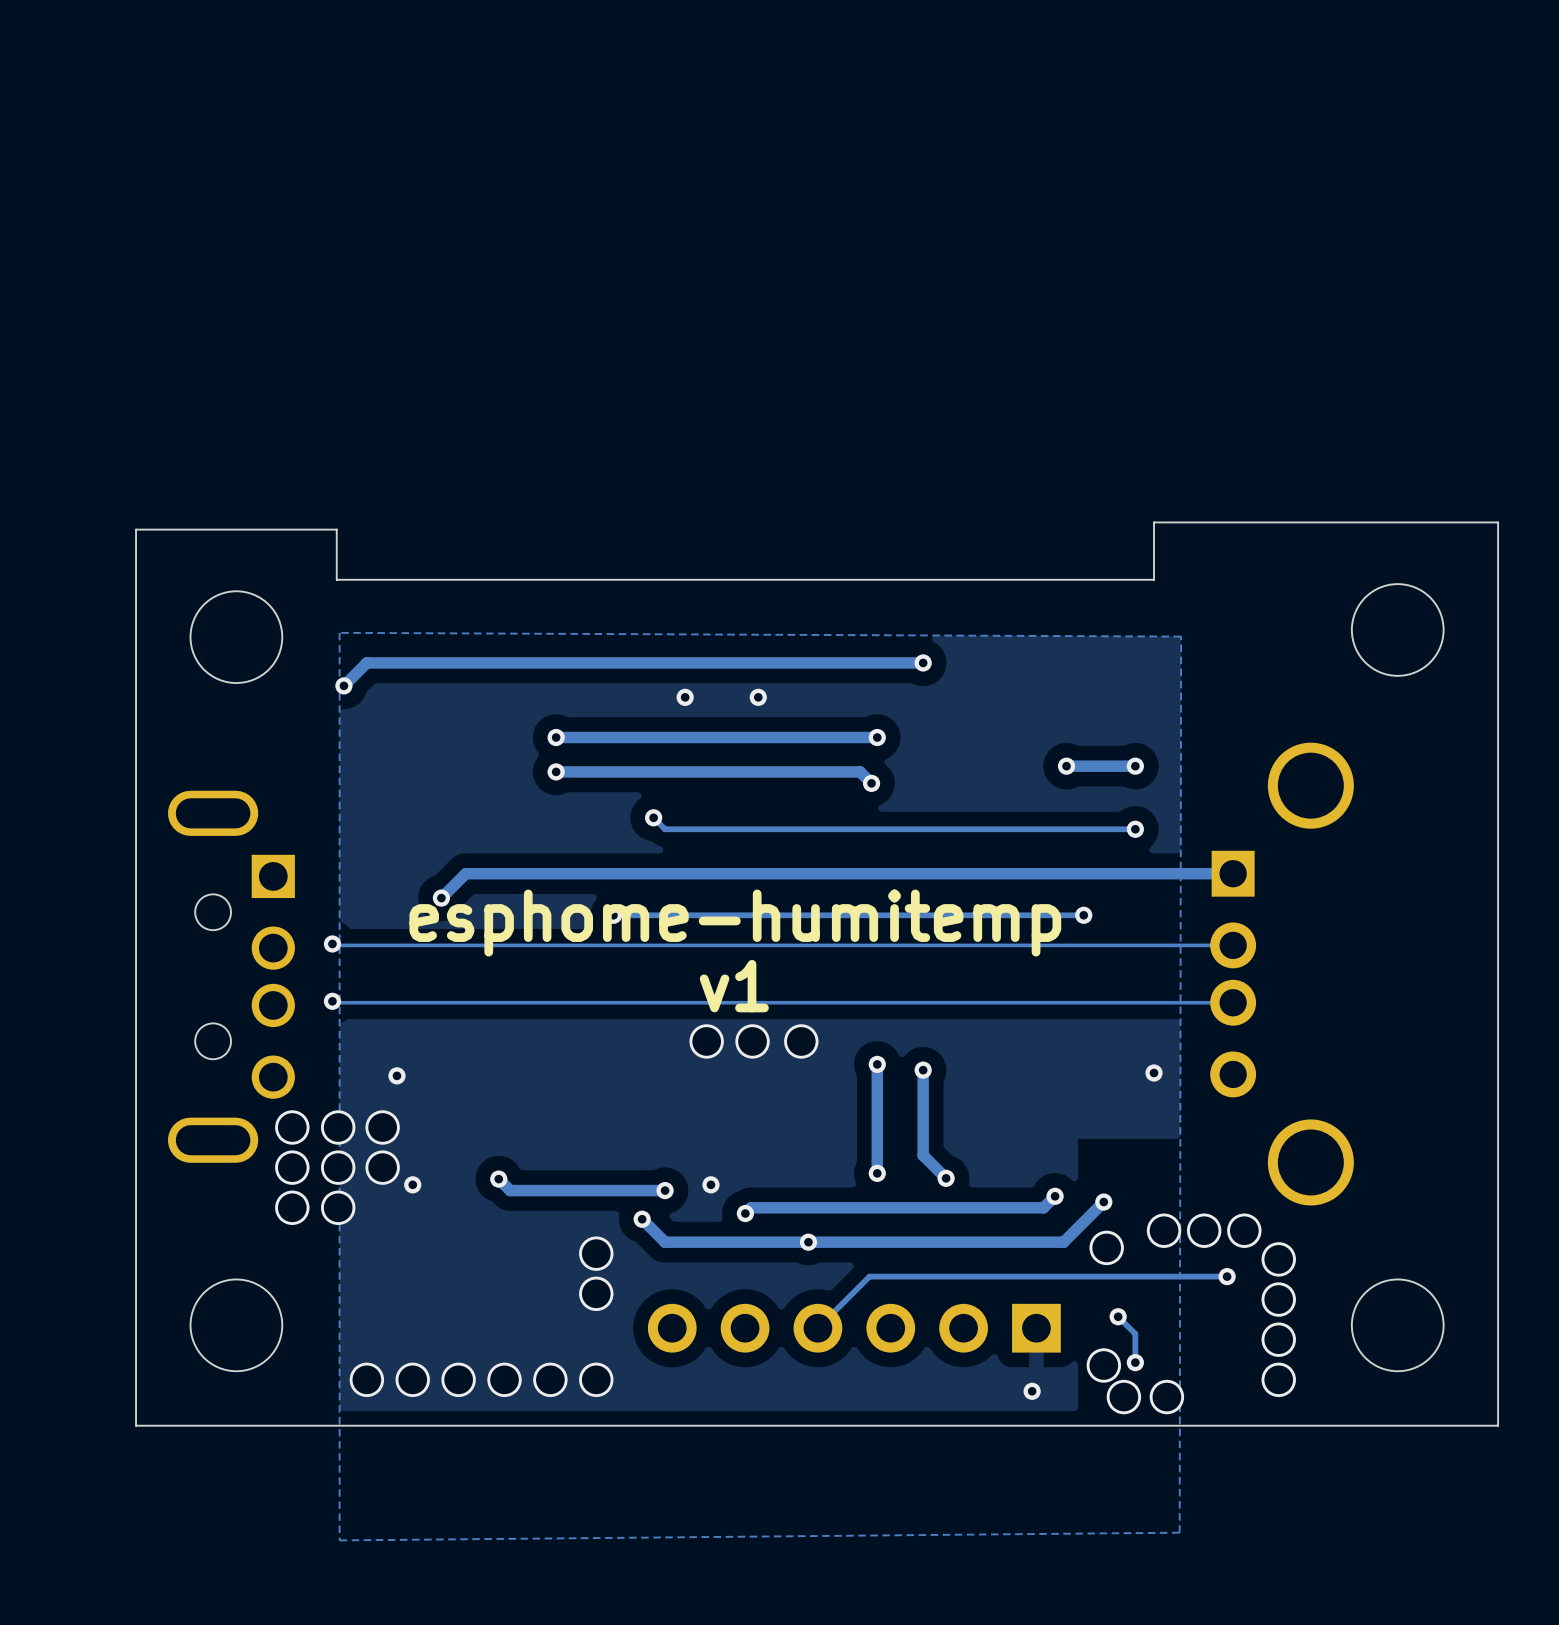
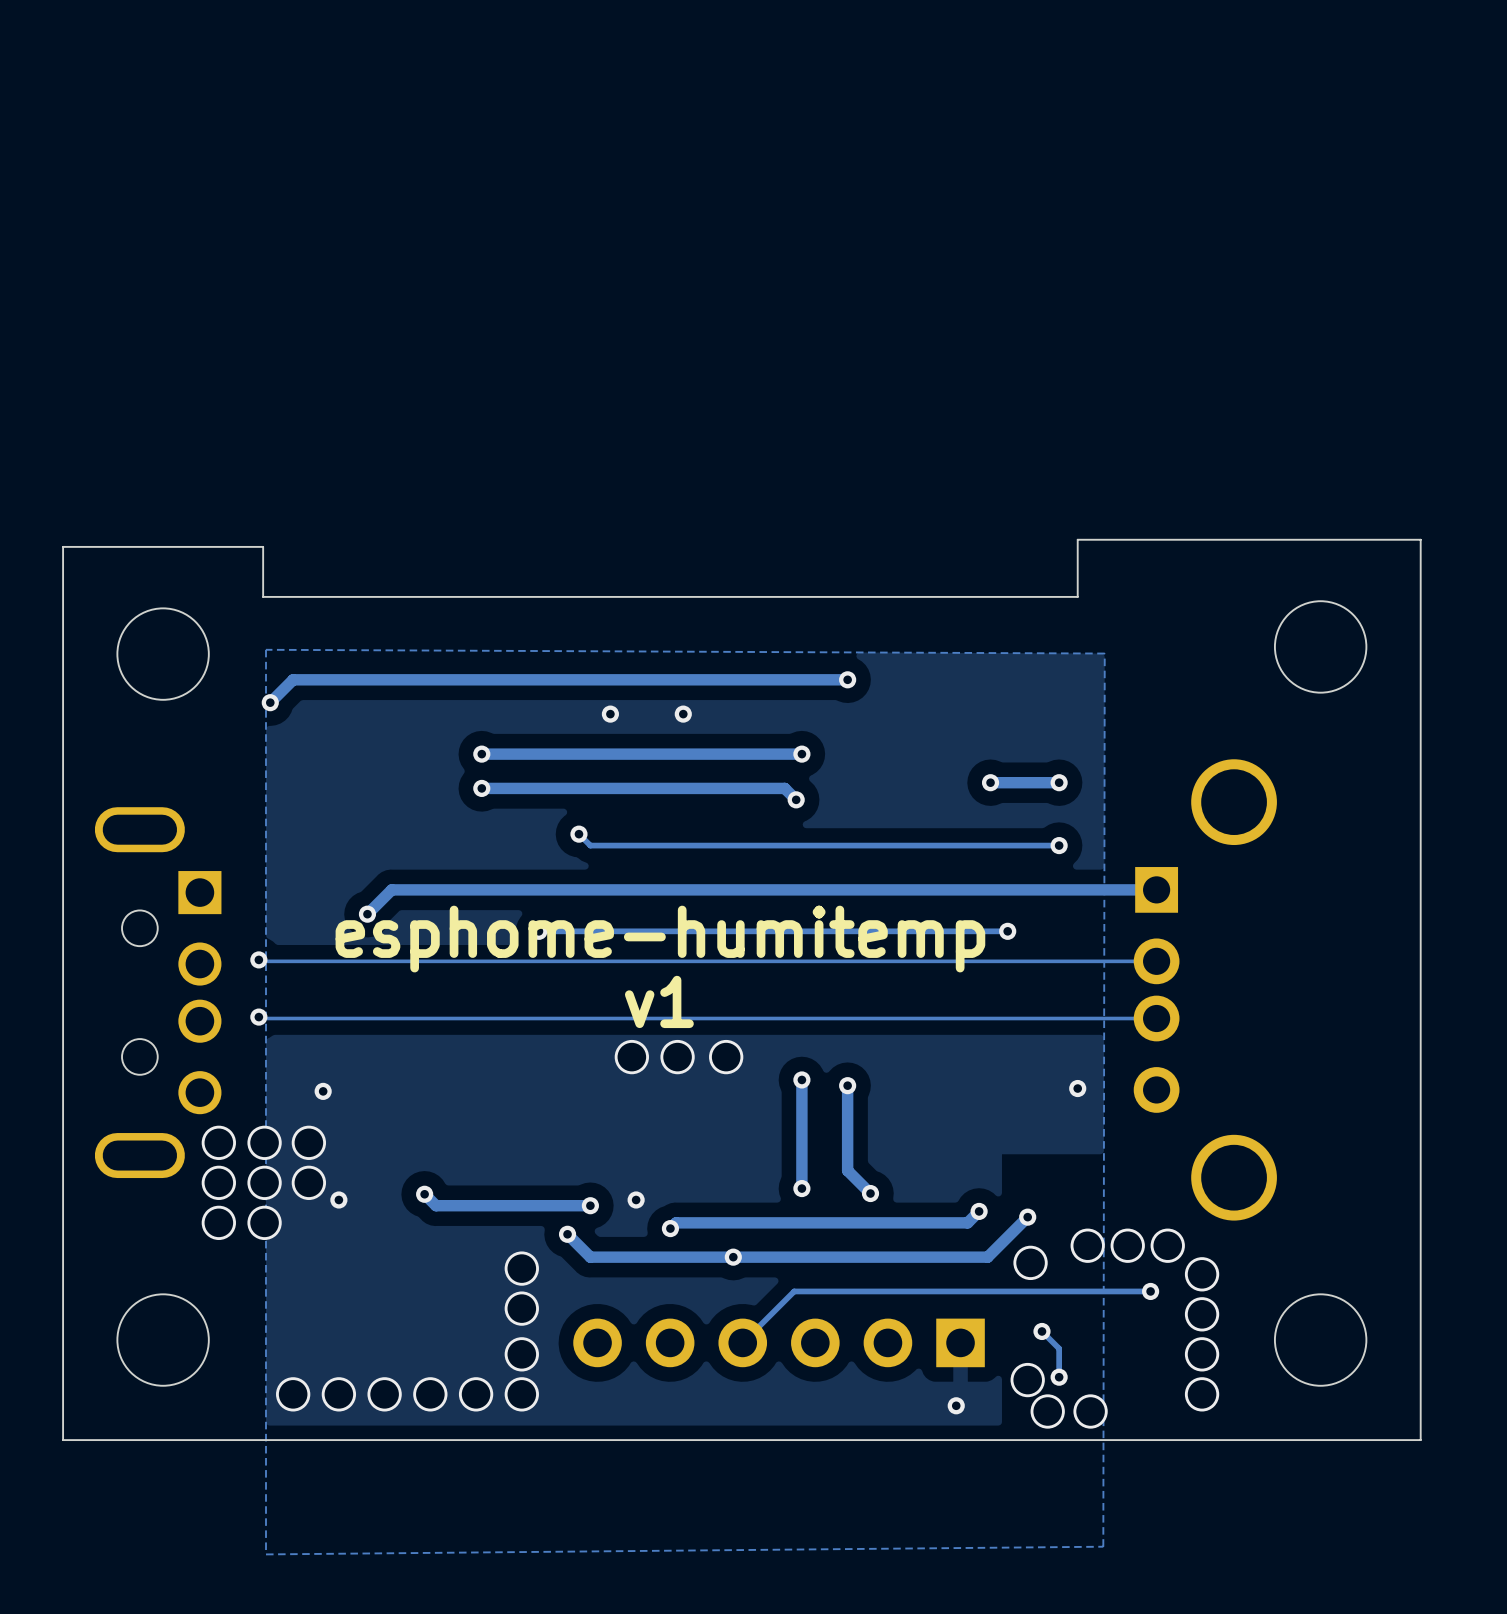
via: none -> (521, 1354)

